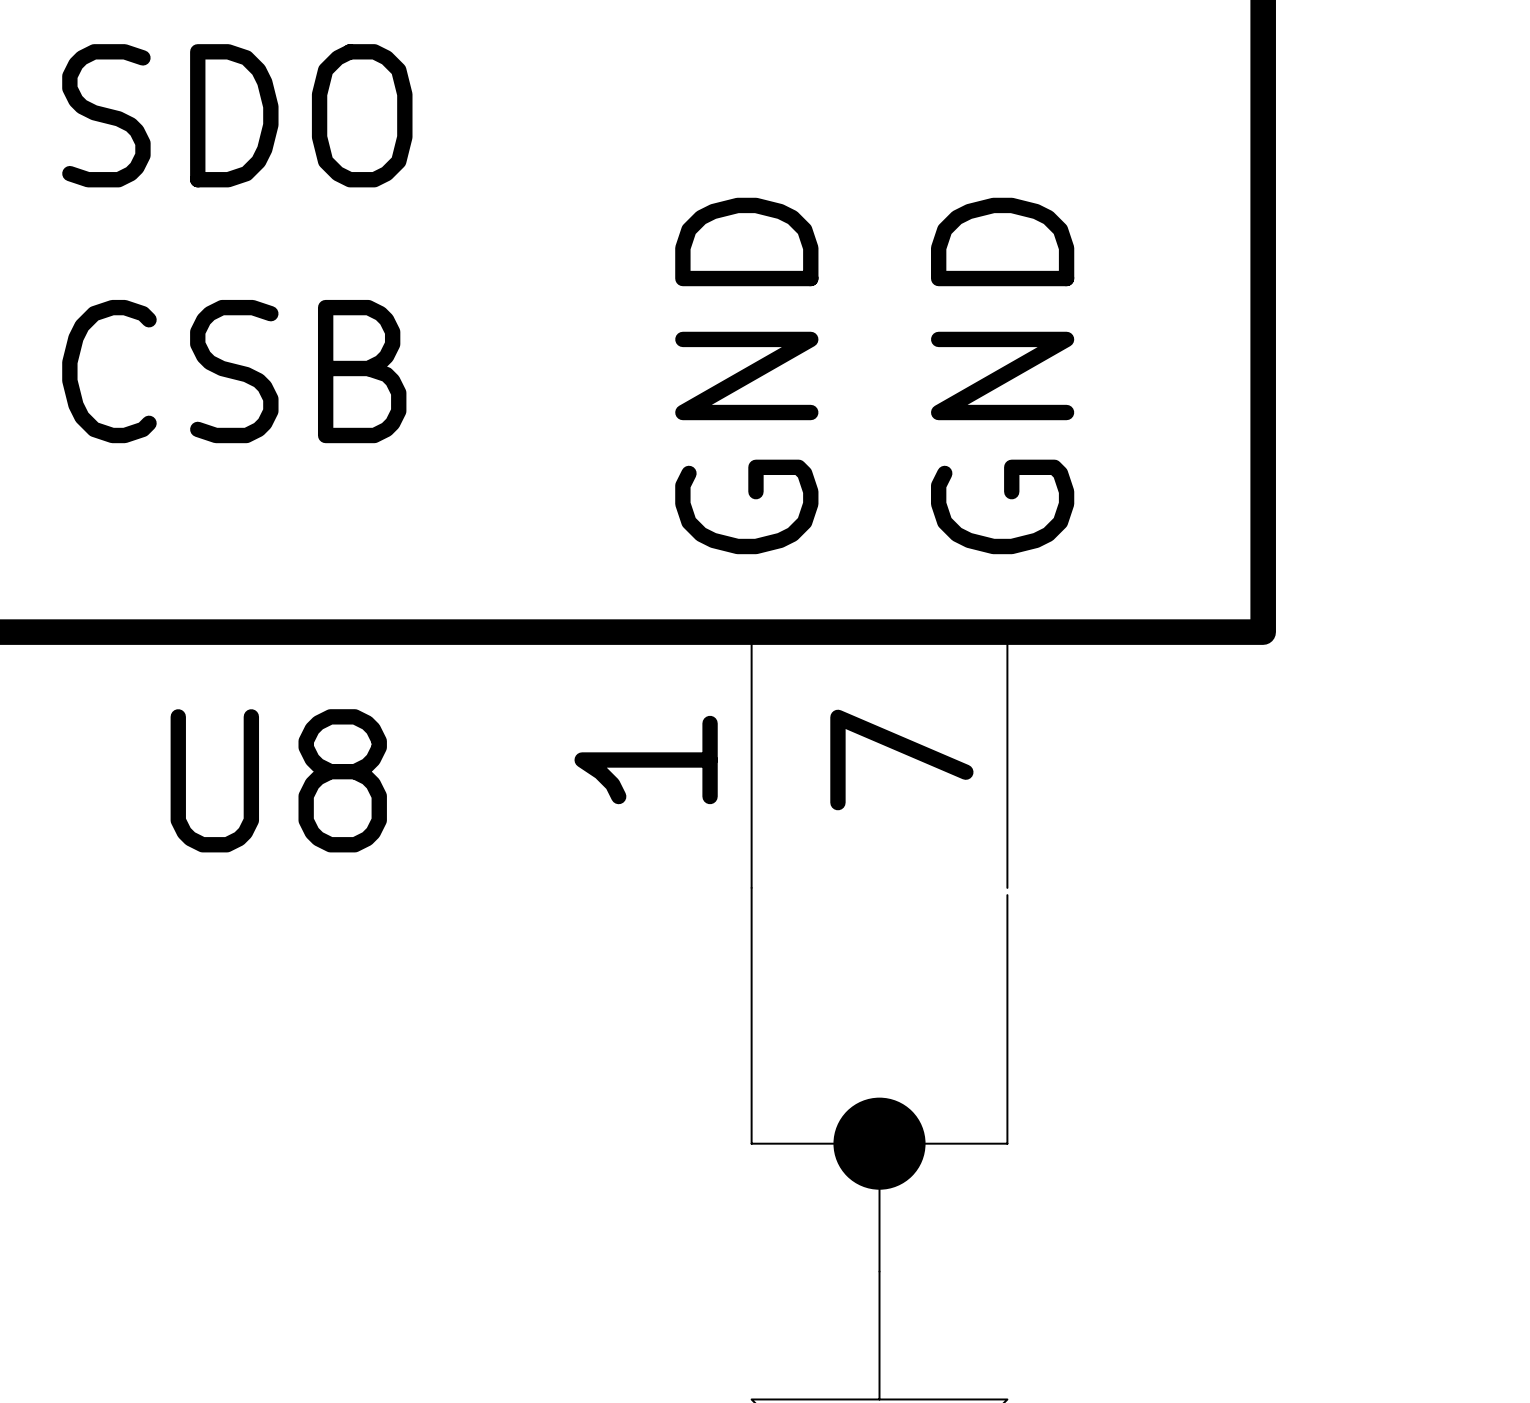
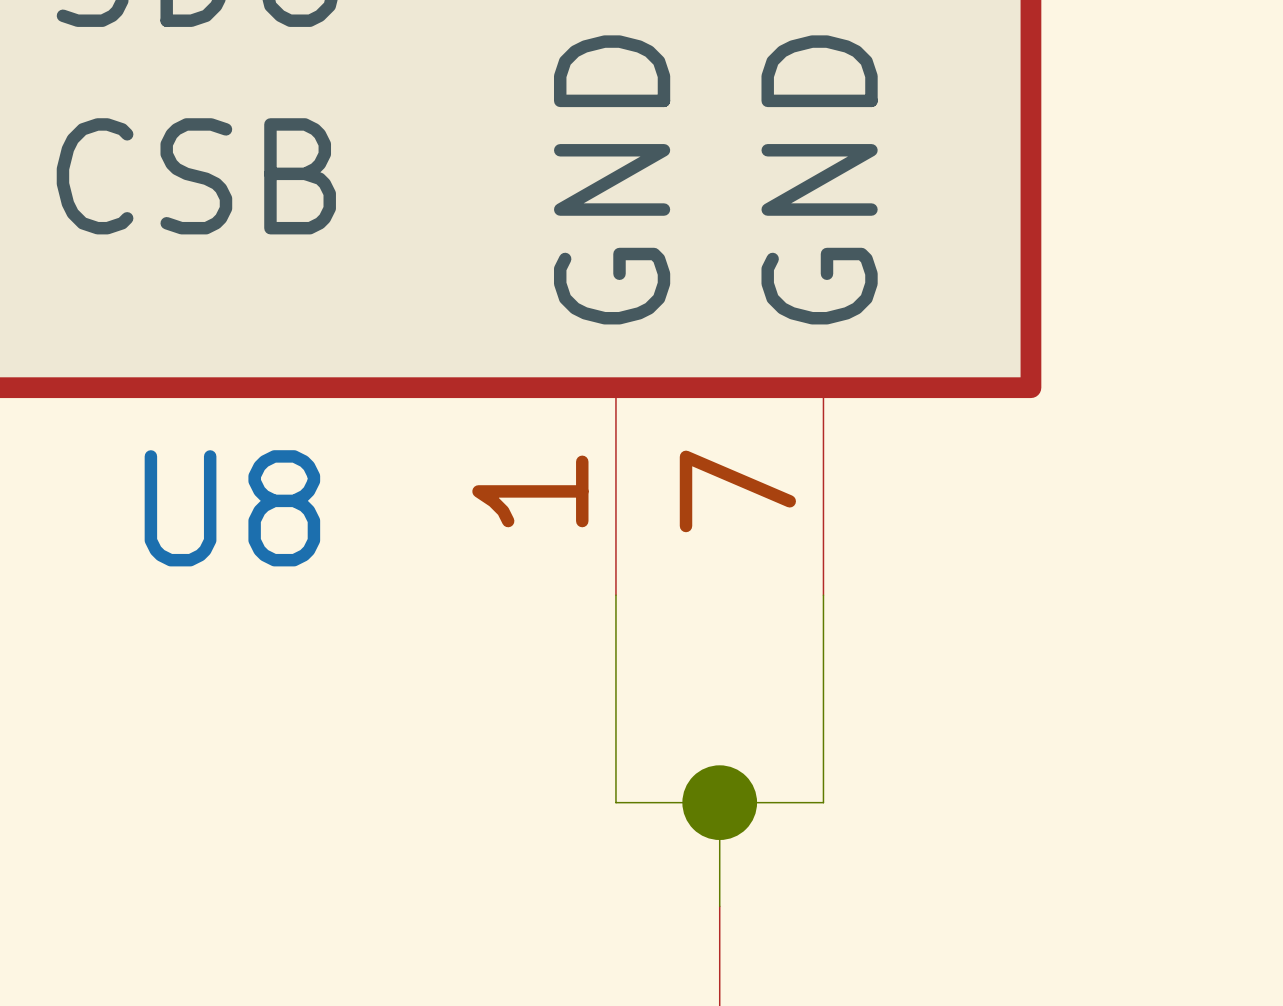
wire: none -> (823, 595) (823, 601)

